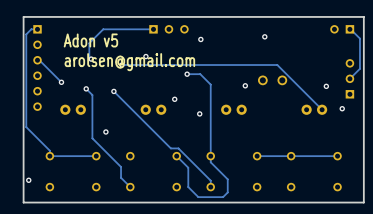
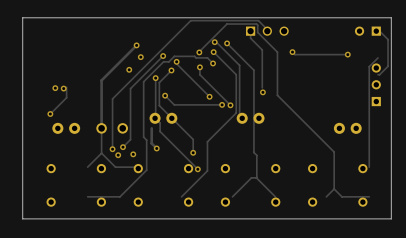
track: (37, 29) (31, 29) (26, 34) (26, 127) (49, 150) (49, 156) (96, 156) -> none
track: (153, 29) (103, 29) (89, 43) (89, 57) (91, 59) -> none
part: (168, 29) -> none
track: none -> (250, 31) (250, 38) (262, 49) (262, 87)
track: none -> (267, 31) (258, 20) (190, 20) (112, 98) (112, 149)
part: none -> (267, 31)
track: (349, 29) (359, 38) (359, 68) (349, 78) -> none
track: none -> (379, 31) (388, 39) (388, 66) (377, 74)
via position: (264, 36) -> (292, 52)
track: none -> (216, 42) (239, 65) (239, 119)
text: Adon v5 (90, 40) -> none
track: none -> (227, 43) (253, 70) (253, 152) (256, 155) (256, 177)
via: none -> (227, 43)
track: none -> (136, 45) (101, 80) (101, 153)
via: none -> (136, 45)
track: none -> (199, 52) (227, 24) (257, 25) (257, 32) (277, 52) (277, 95) (334, 152) (334, 189)
via: none -> (199, 52)
track: none -> (213, 52) (236, 74) (236, 113) (207, 141) (207, 170) (181, 196)
via: none -> (213, 52)
track: none -> (292, 52) (295, 54) (347, 54)
via: none -> (347, 54)
track: none -> (163, 56) (130, 88) (130, 139) (123, 147)
via: none -> (163, 56)
via: none -> (140, 57)
track: none -> (377, 57) (369, 66) (369, 167)
via: (145, 56) -> none
track: none -> (176, 61) (209, 96)
via: none -> (176, 61)
via: (91, 59) -> none
track: none -> (213, 63) (207, 57) (174, 56) (168, 61) (163, 61) (143, 81) (143, 137) (146, 140) (146, 170) (119, 196) (87, 196)
via: none -> (213, 63)
track: (37, 60) (61, 82) -> none
text: arolsen@gmail.com (129, 62) -> none
track: none -> (199, 67) (199, 74) (230, 105)
via: none -> (199, 67)
track: (121, 65) (277, 65) (322, 109) -> none
track: none -> (171, 70) (159, 82) (159, 105) (193, 139) (193, 152)
via: none -> (171, 70)
part: (37, 67) -> none
track: none -> (155, 78) (155, 118) (160, 123) (160, 131) (197, 169)
via: none -> (155, 78)
track: (187, 74) (200, 74) (210, 84) (210, 162) (227, 179) (227, 192) (223, 197) (198, 197) (188, 187) (188, 167) (176, 156) -> none
via: (187, 74) -> none
part: (272, 80) -> none
via: none -> (55, 88)
track: none -> (66, 87) (66, 97) (50, 114)
via: (326, 86) -> none
track: (86, 88) (92, 95) (92, 138) (121, 166) (121, 177) (130, 187) -> none
via: (86, 88) -> none
track: none -> (165, 95) (174, 104) (222, 104)
via: none -> (165, 95)
via: none -> (209, 96)
track: (113, 91) (170, 148) (178, 148) (210, 180) (210, 187) -> none
via: (113, 91) -> none
via: none -> (222, 104)
via: none -> (230, 105)
via: (174, 99) -> none
via: none -> (50, 114)
via: (342, 108) -> none
part position: (73, 109) -> (66, 128)
part position: (314, 109) -> (347, 128)
via: (199, 113) -> none
part: none -> (112, 128)
track: none -> (151, 128) (151, 143) (156, 148)
via: (105, 131) -> none
via: none -> (123, 147)
via: none -> (156, 148)
via: none -> (112, 149)
track: none -> (101, 153) (87, 167)
track: none -> (101, 153) (115, 167) (138, 167)
via: none -> (193, 152)
via: none -> (118, 155)
via: none -> (133, 154)
via: none -> (197, 169)
track: (337, 156) (257, 156) -> none
track: none -> (256, 177) (275, 196)
track: none -> (256, 177) (251, 177) (232, 196)
track: none -> (334, 189) (341, 196) (369, 196)
track: none -> (334, 189) (326, 196)
via: (28, 180) -> none

